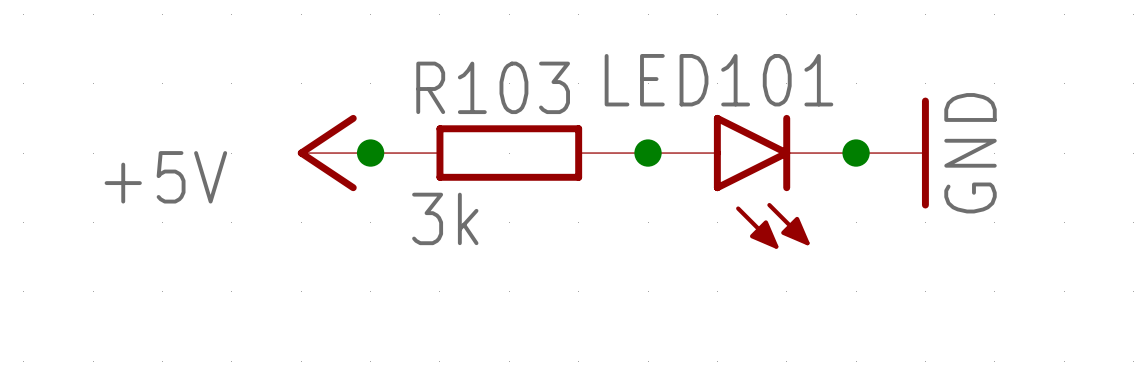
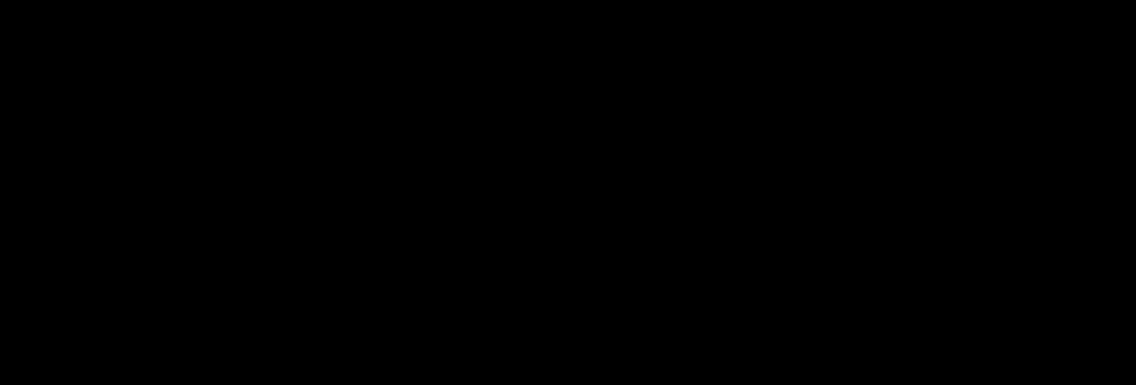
power symbol: +5V (334, 153) -> none
junction: (370, 153) -> none
R103: 3k (509, 153) -> none
junction: (648, 153) -> none
junction: (856, 153) -> none
power symbol: GND (892, 153) -> none
LED101: (752, 181) -> none

